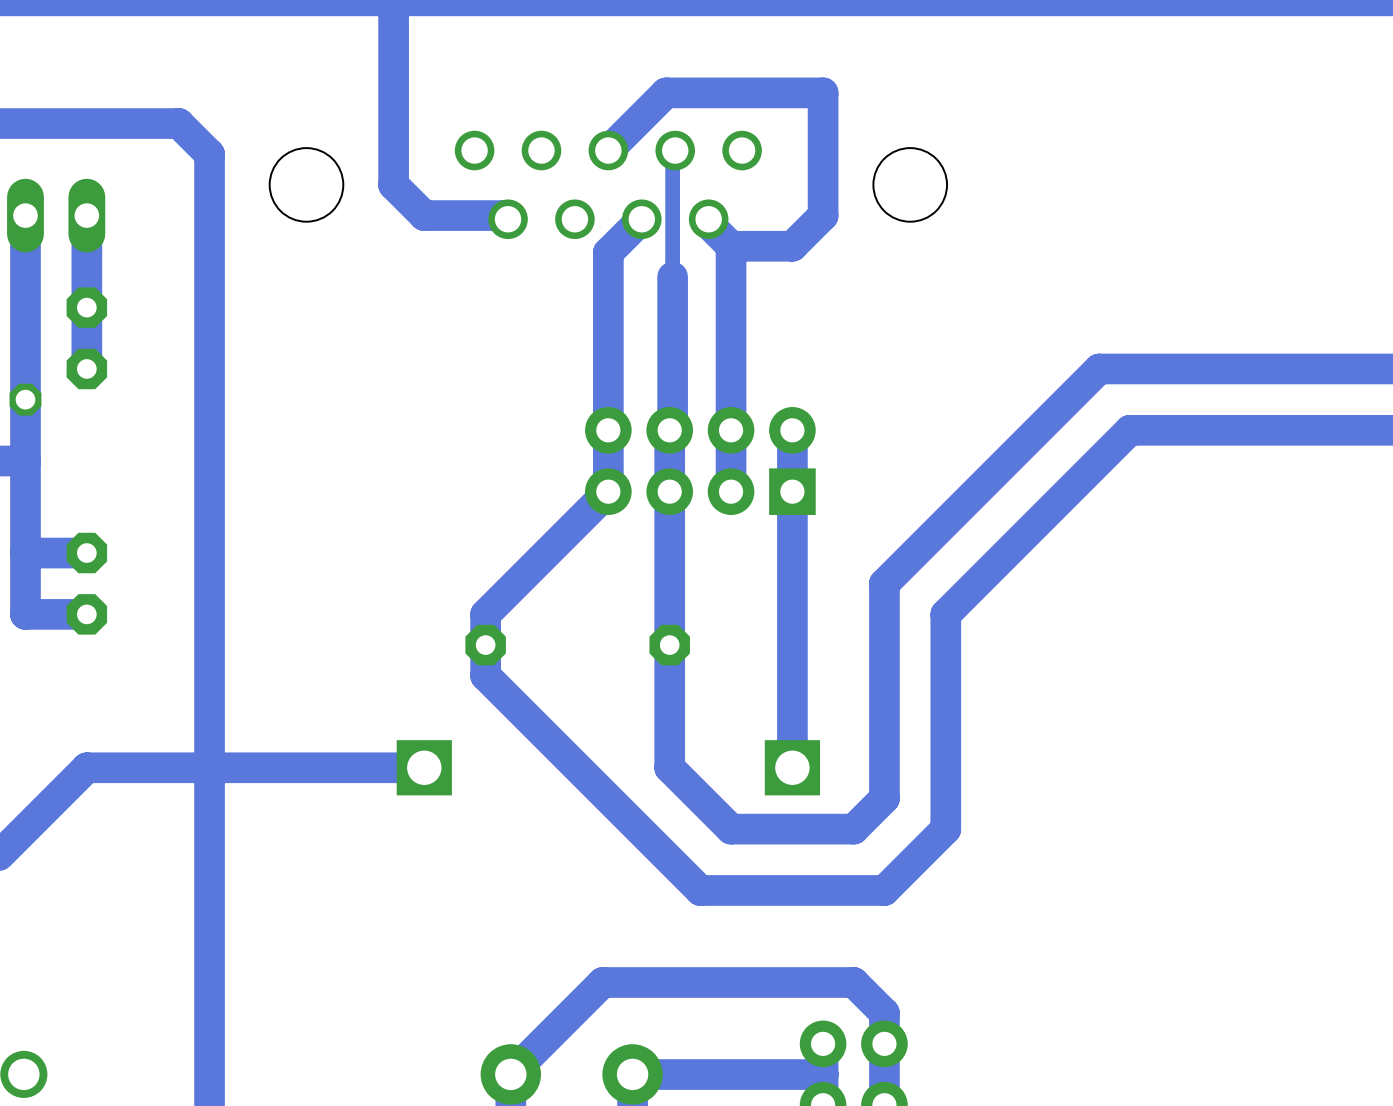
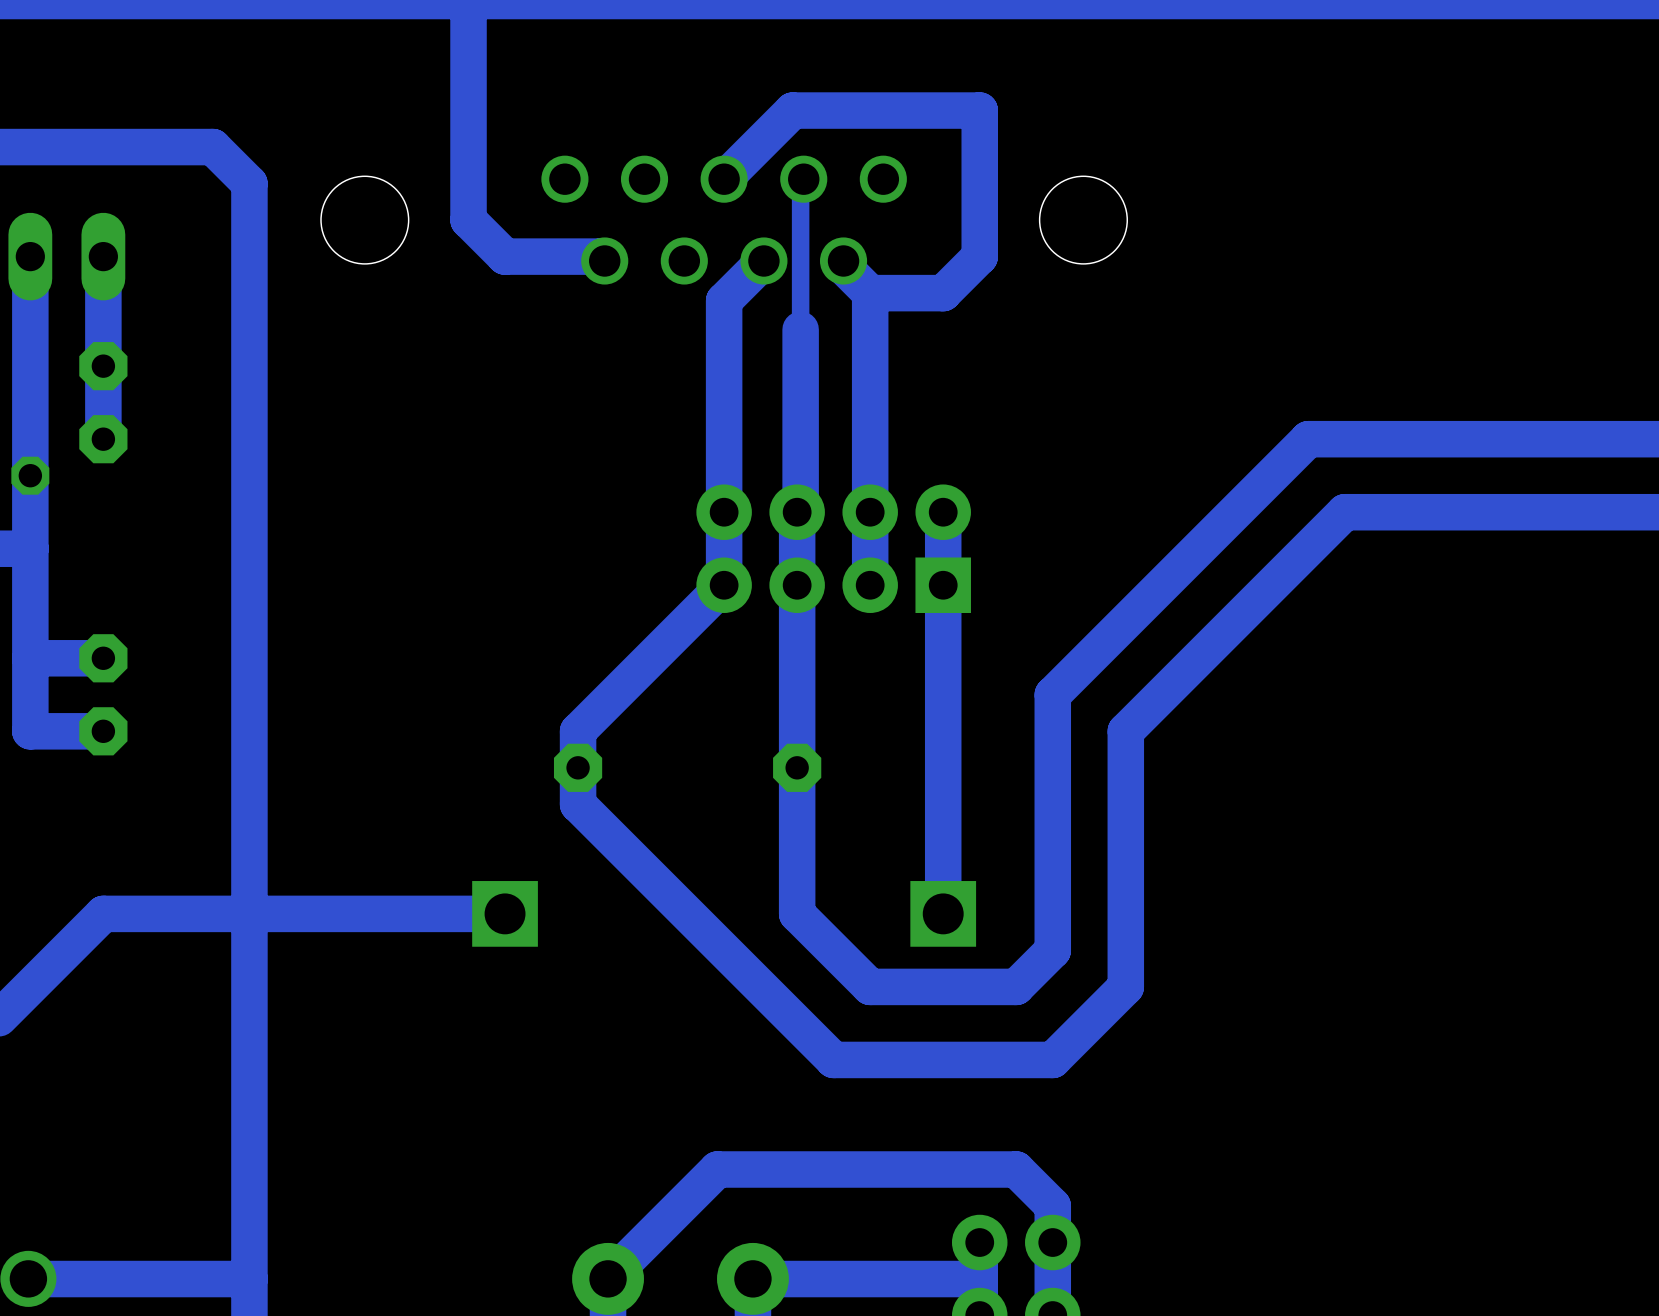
track: none -> (249, 1279) (28, 1279)

